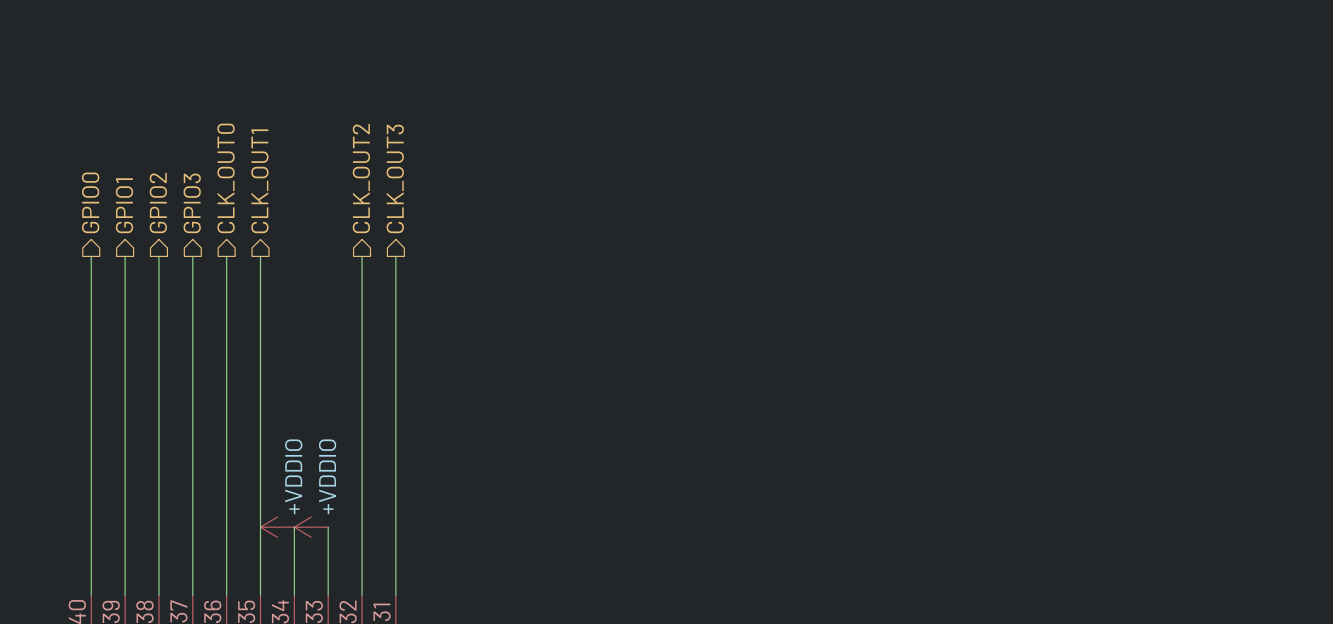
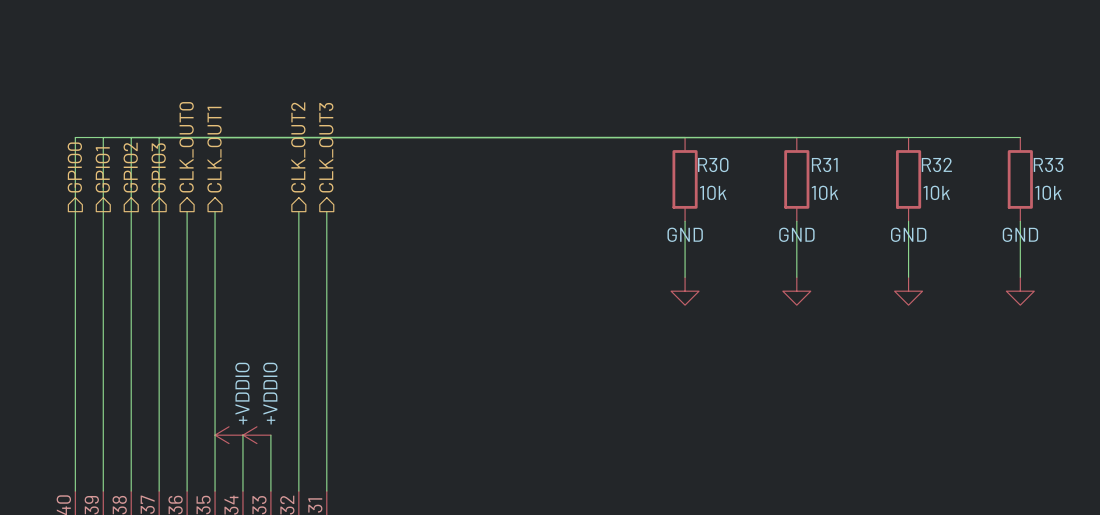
wire: none -> (103, 137) (103, 211)
wire: none -> (131, 137) (131, 211)
wire: none -> (159, 137) (159, 211)
wire: none -> (1020, 137) (75, 137) (75, 211)
R30: none -> 10k (685, 179)
R31: none -> 10k (796, 179)
R32: none -> 10k (908, 179)
R33: none -> 10k (1020, 179)
wire: none -> (685, 221) (685, 277)
wire: none -> (796, 221) (796, 277)
wire: none -> (908, 221) (908, 277)
wire: none -> (1020, 221) (1020, 277)
power symbol: none -> GND (685, 291)
power symbol: none -> GND (796, 291)
power symbol: none -> GND (908, 291)
power symbol: none -> GND (1020, 291)

